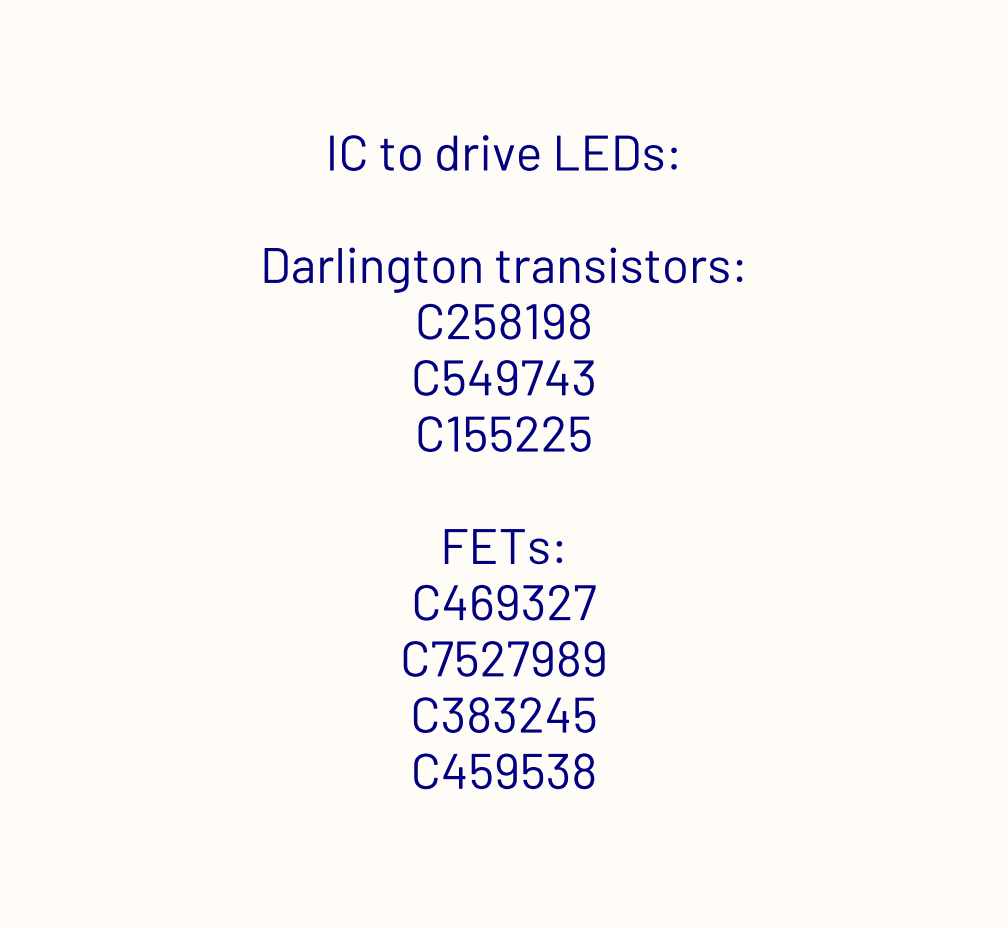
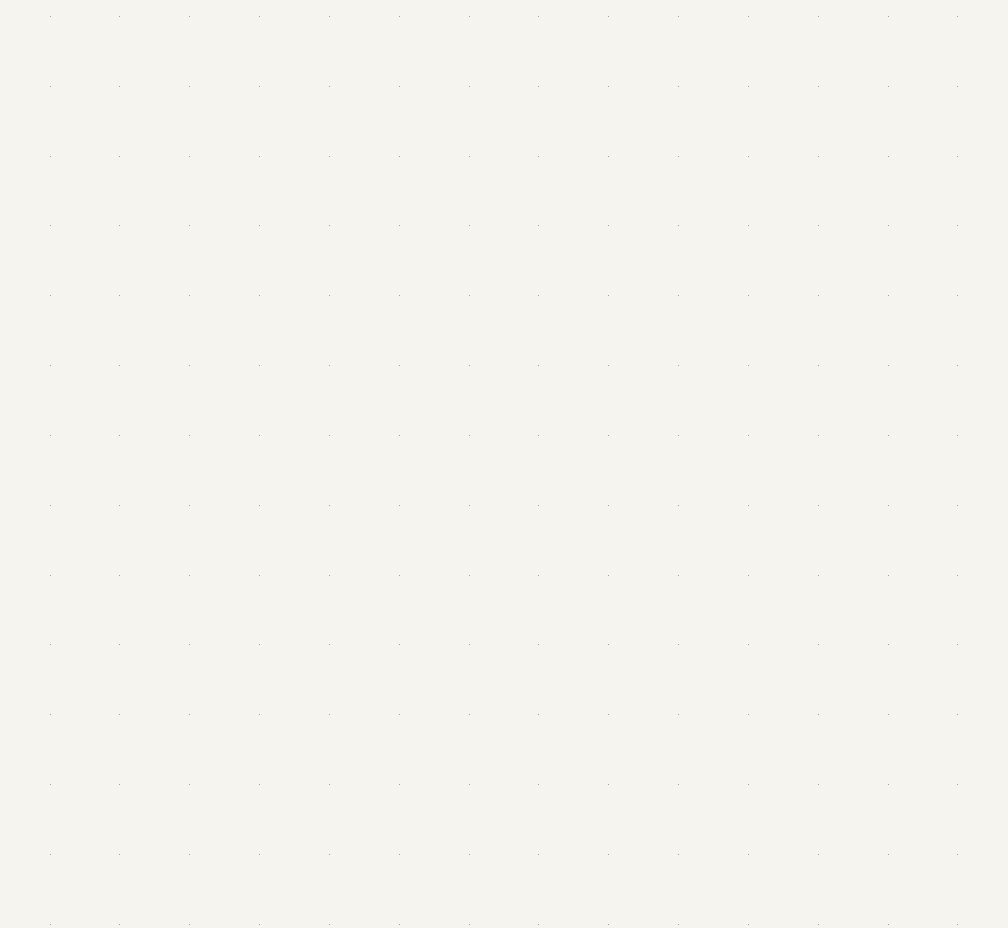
text: IC to drive LEDs: (503, 153) -> none
text: Darlington transistors: (503, 270) -> none
text: C258198 (504, 321) -> none
text: C549743 (504, 377) -> none
text: C155225 (504, 434) -> none
text: FETs: (503, 546) -> none
text: C469327 (505, 602) -> none
text: C7527989 (504, 658) -> none
text: C383245 (504, 715) -> none
text: C459538 (504, 771) -> none

